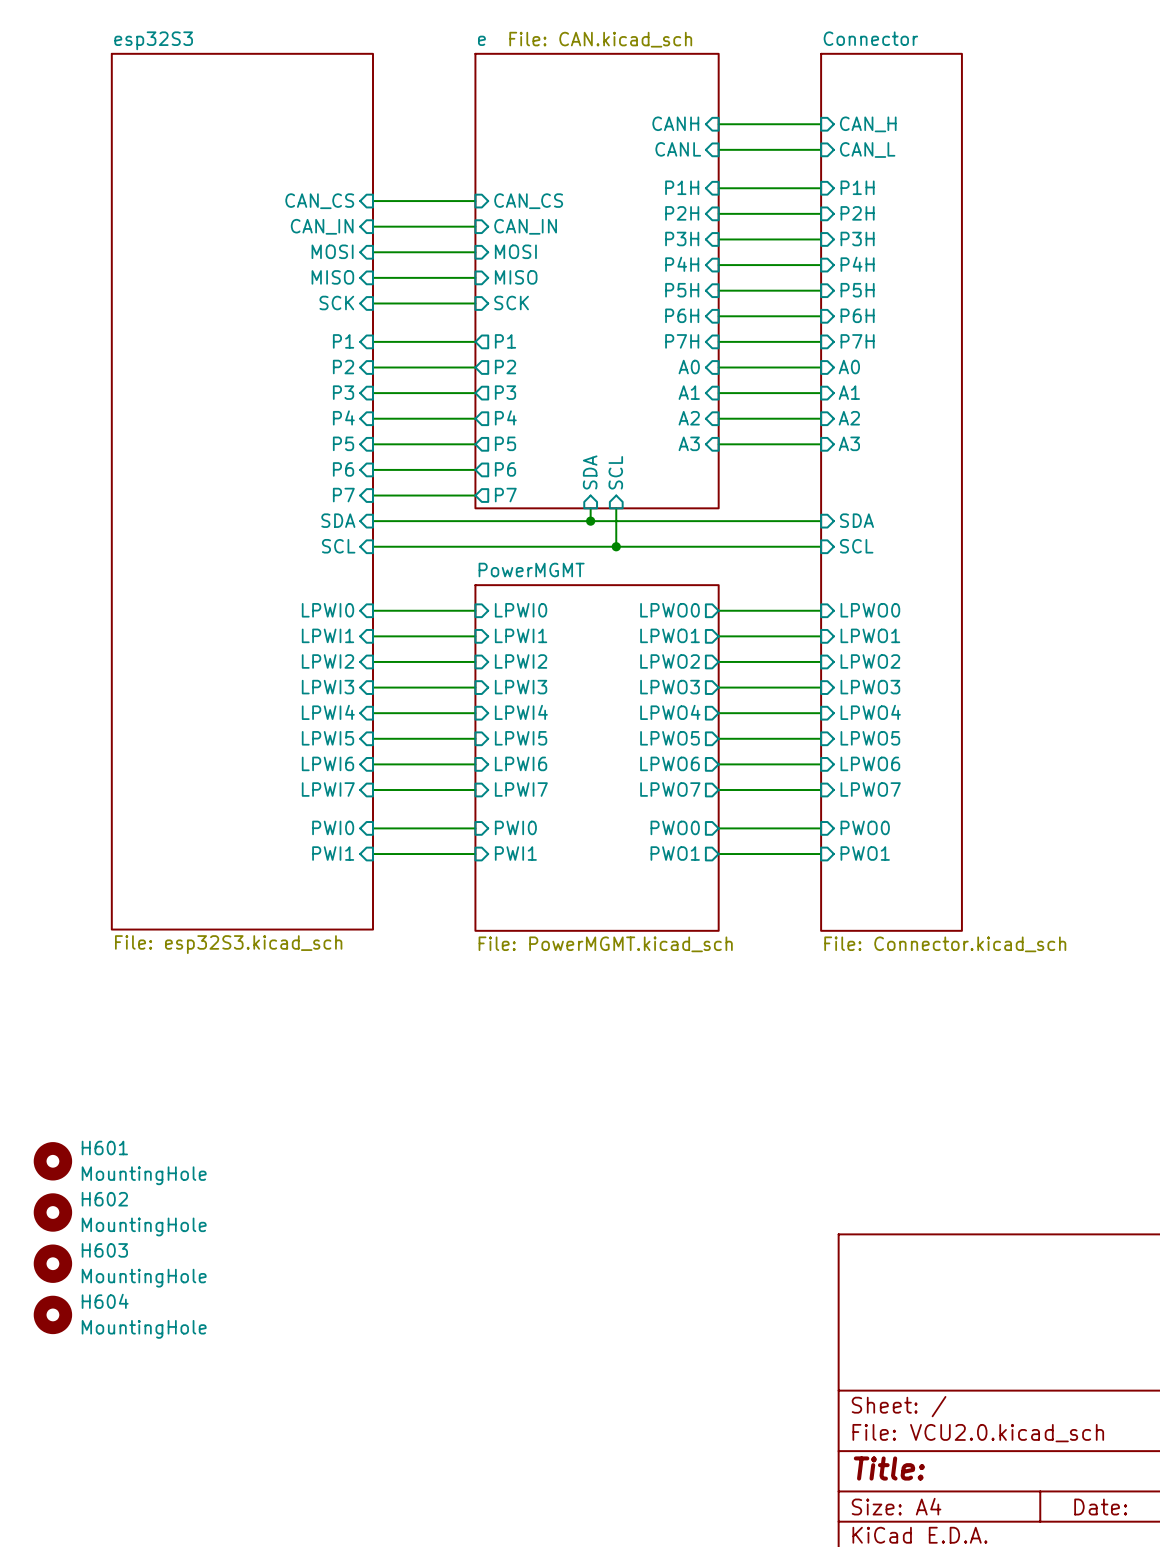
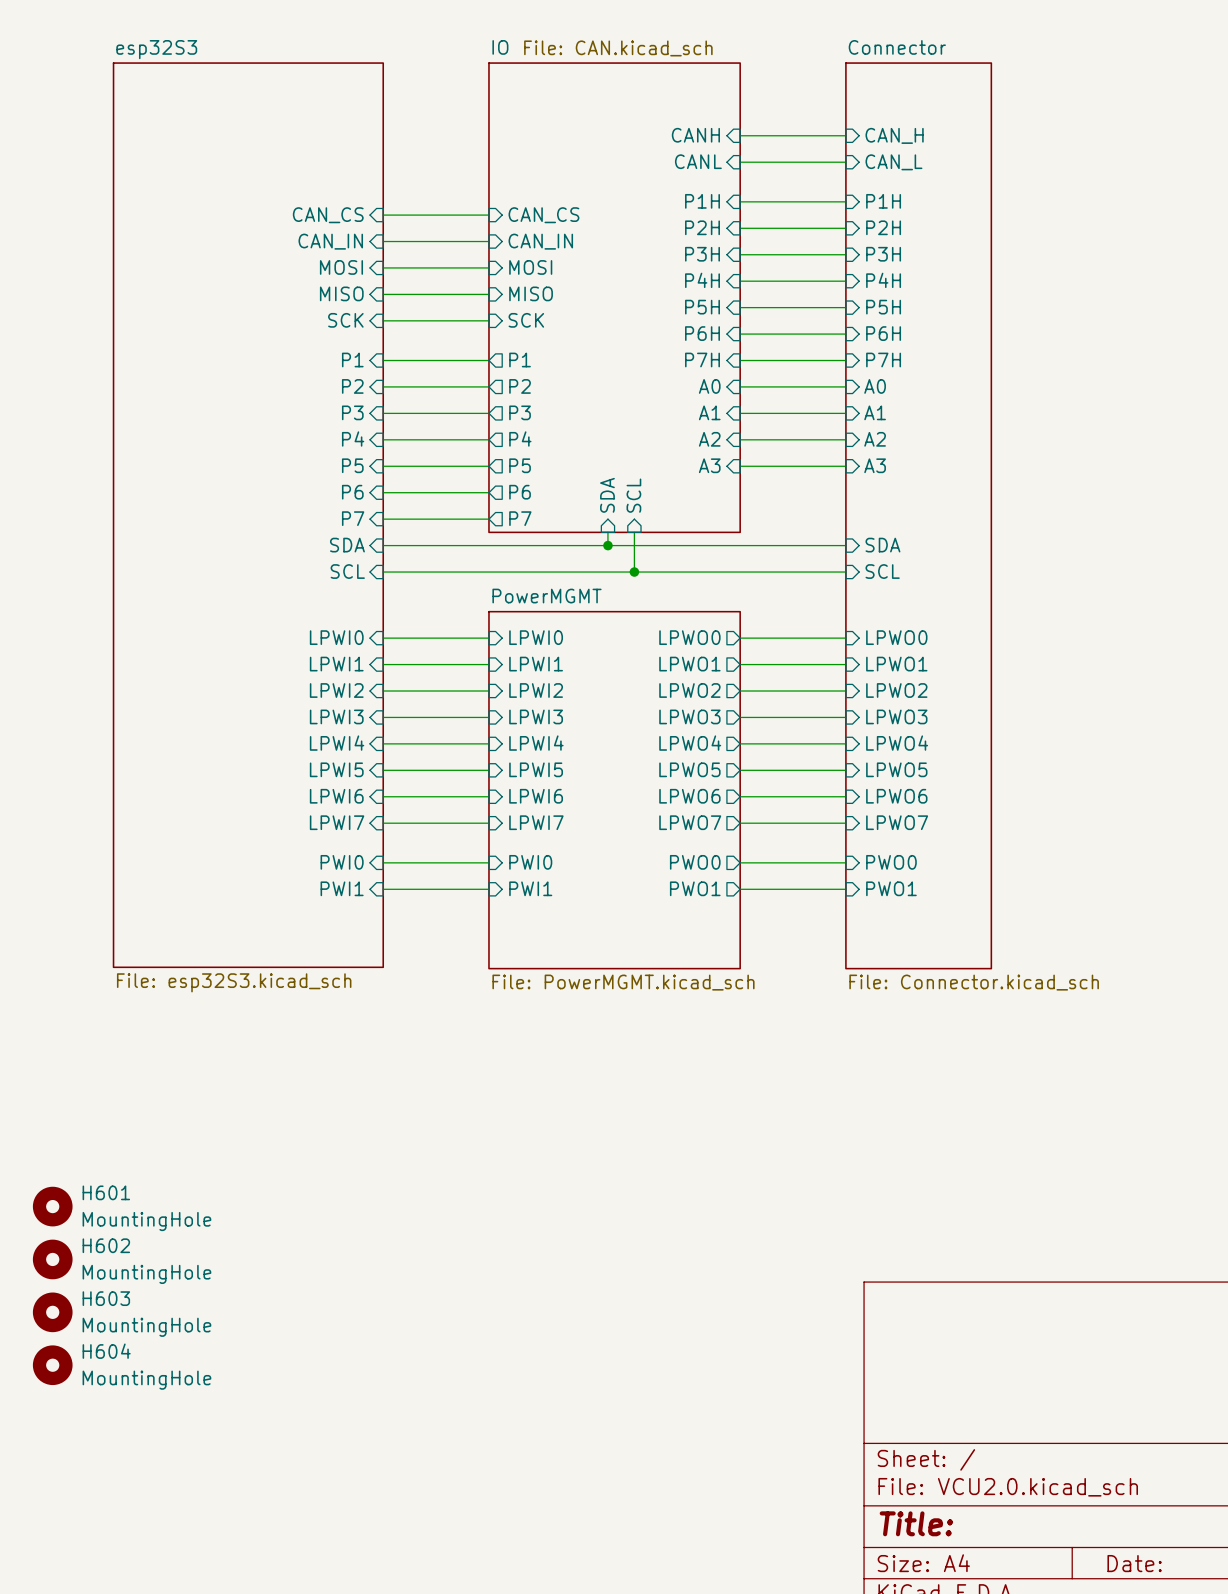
sheet e name: e (481, 40) -> IO (500, 47)

